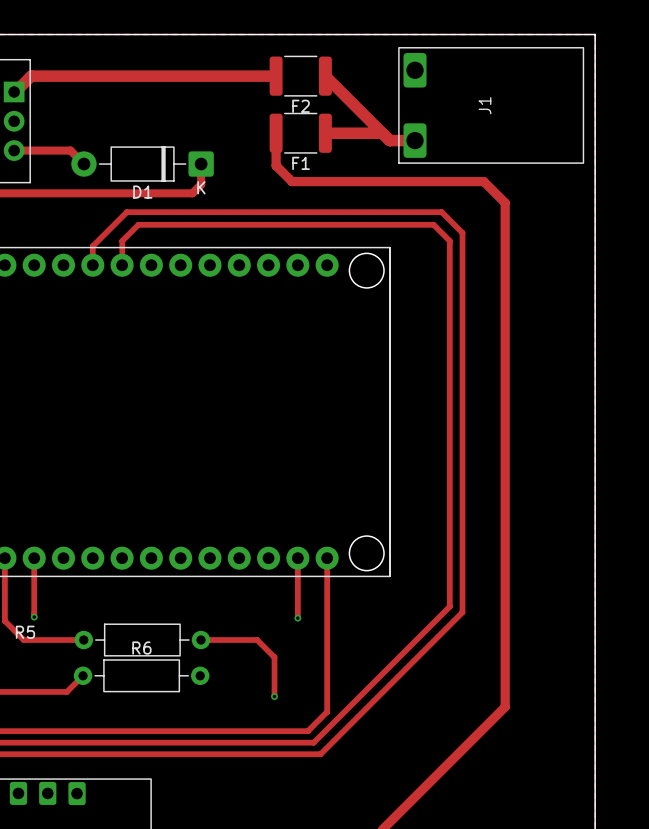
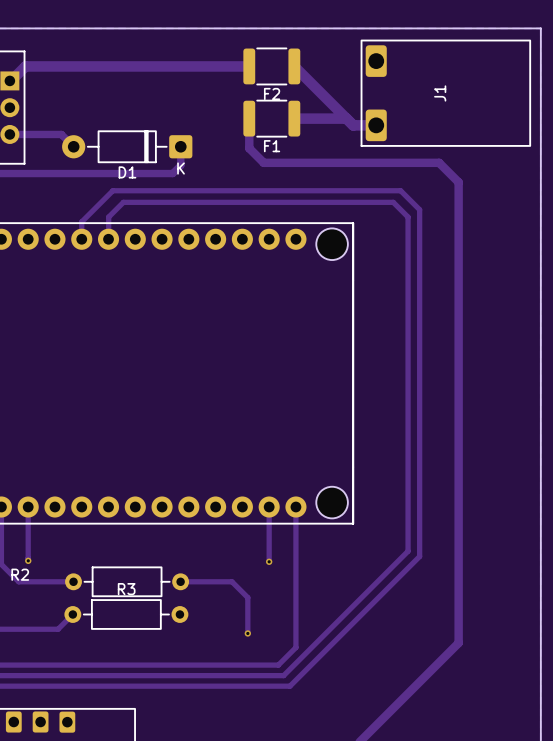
R5 name: R5 (25, 632) -> R2 (20, 574)
R6 name: R6 (141, 648) -> R3 (126, 589)

